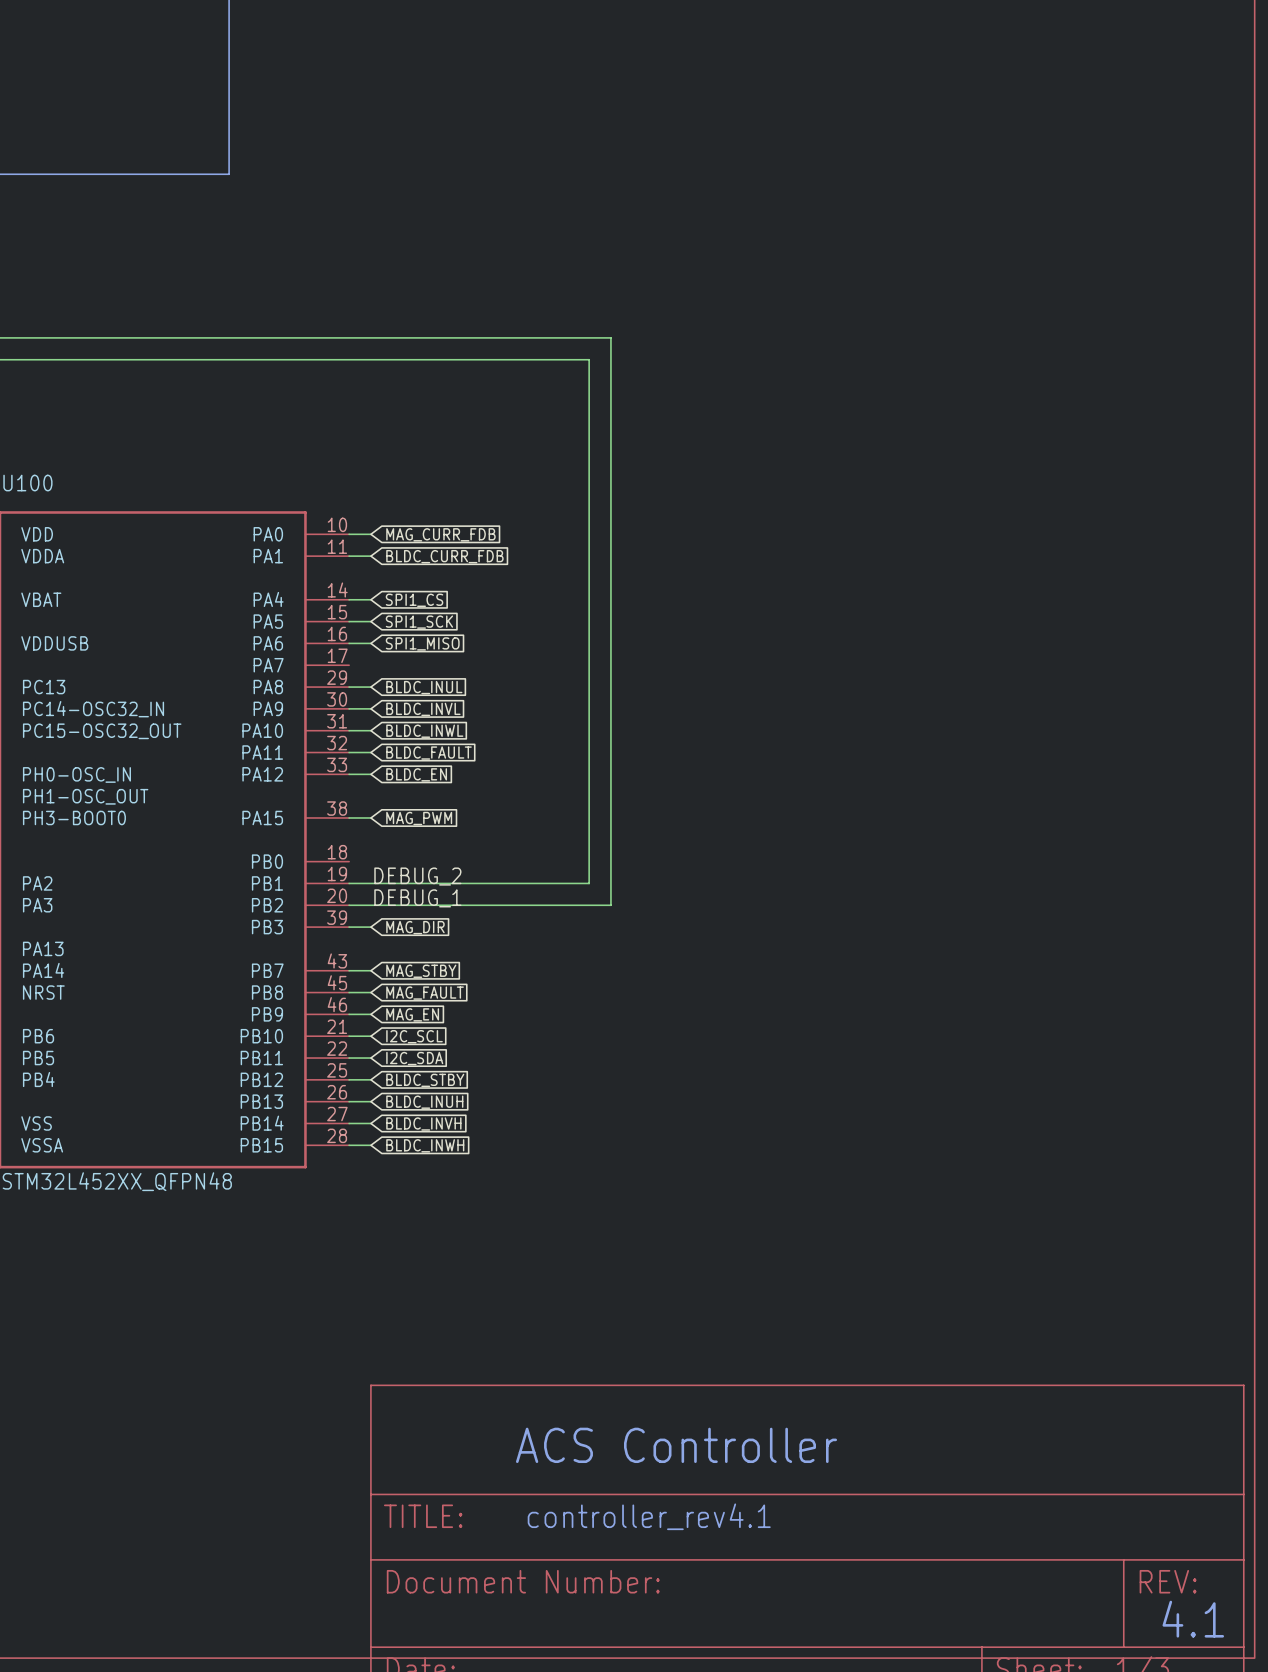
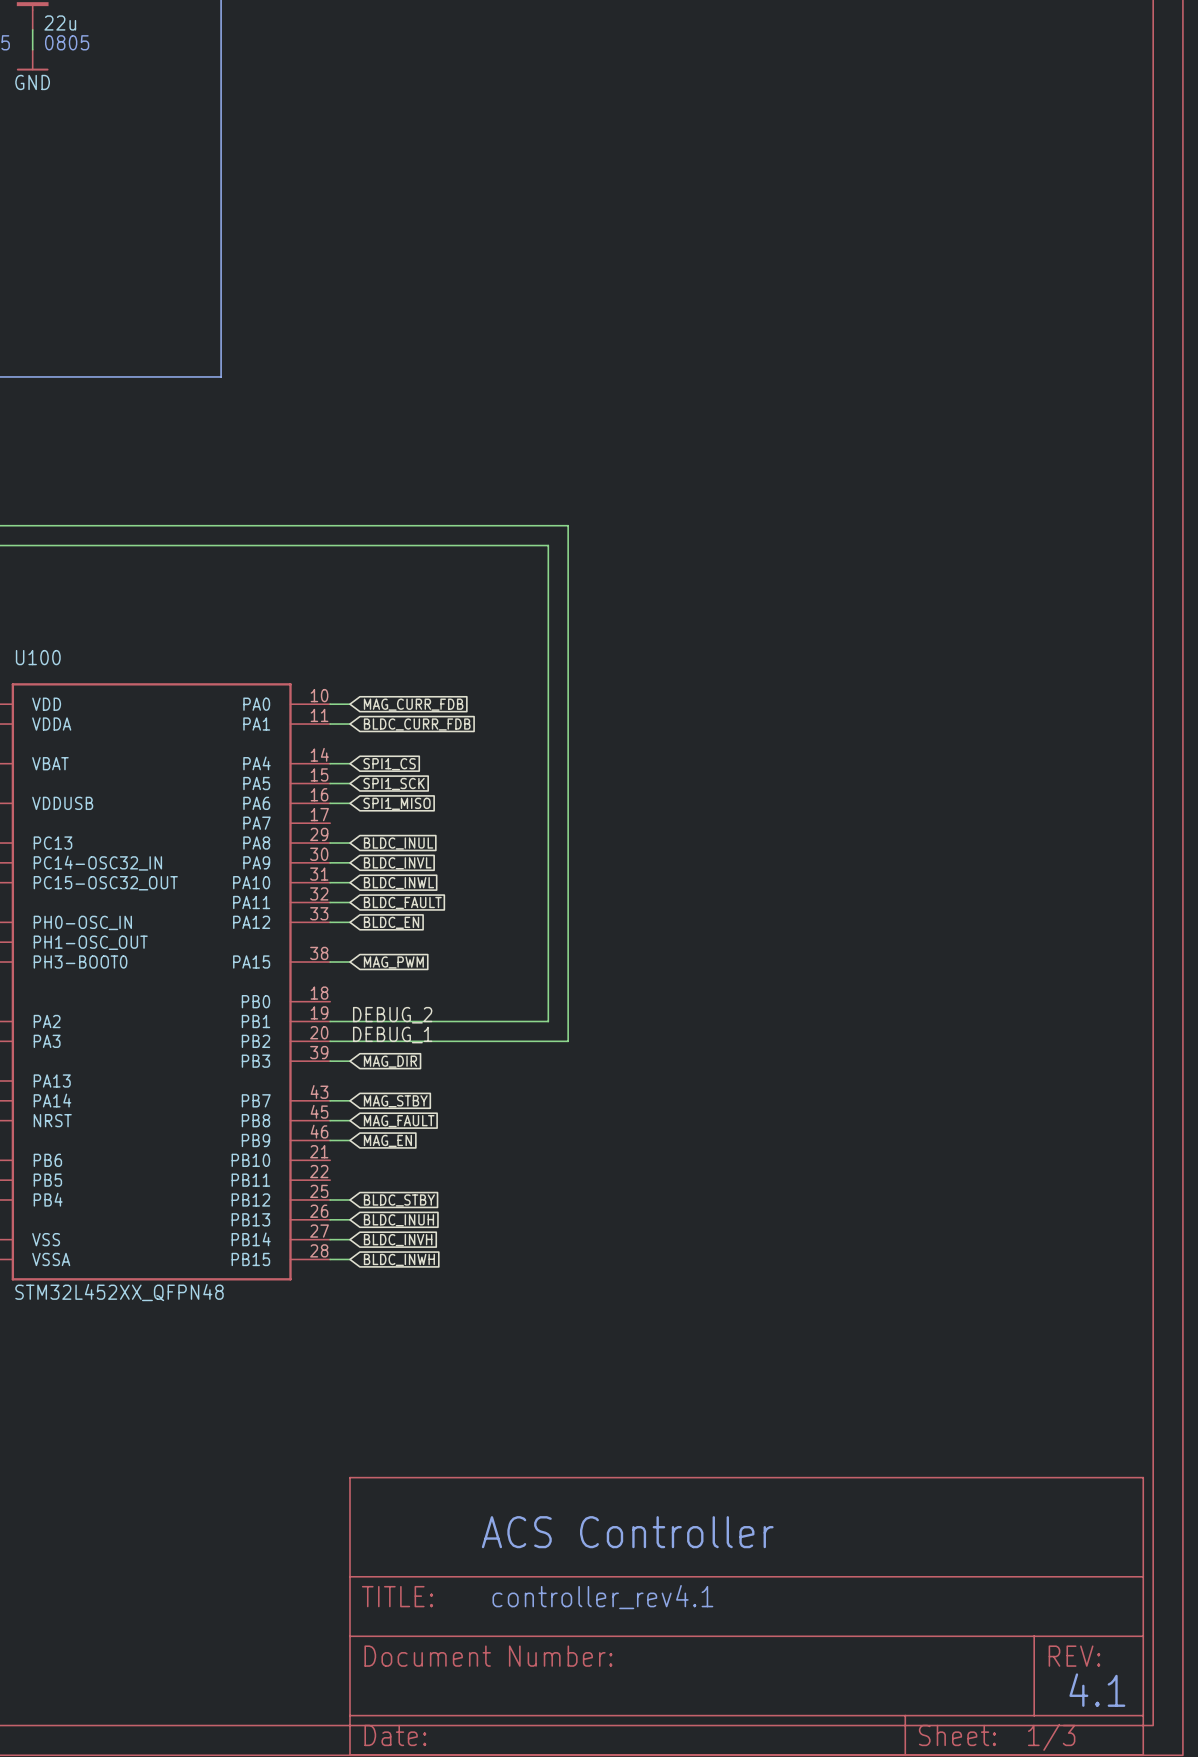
wire: (349, 1036) (370, 1036) -> none
global label: I2C_SCL (414, 1036) -> none
wire: (349, 1058) (370, 1058) -> none
global label: I2C_SDA (414, 1058) -> none

